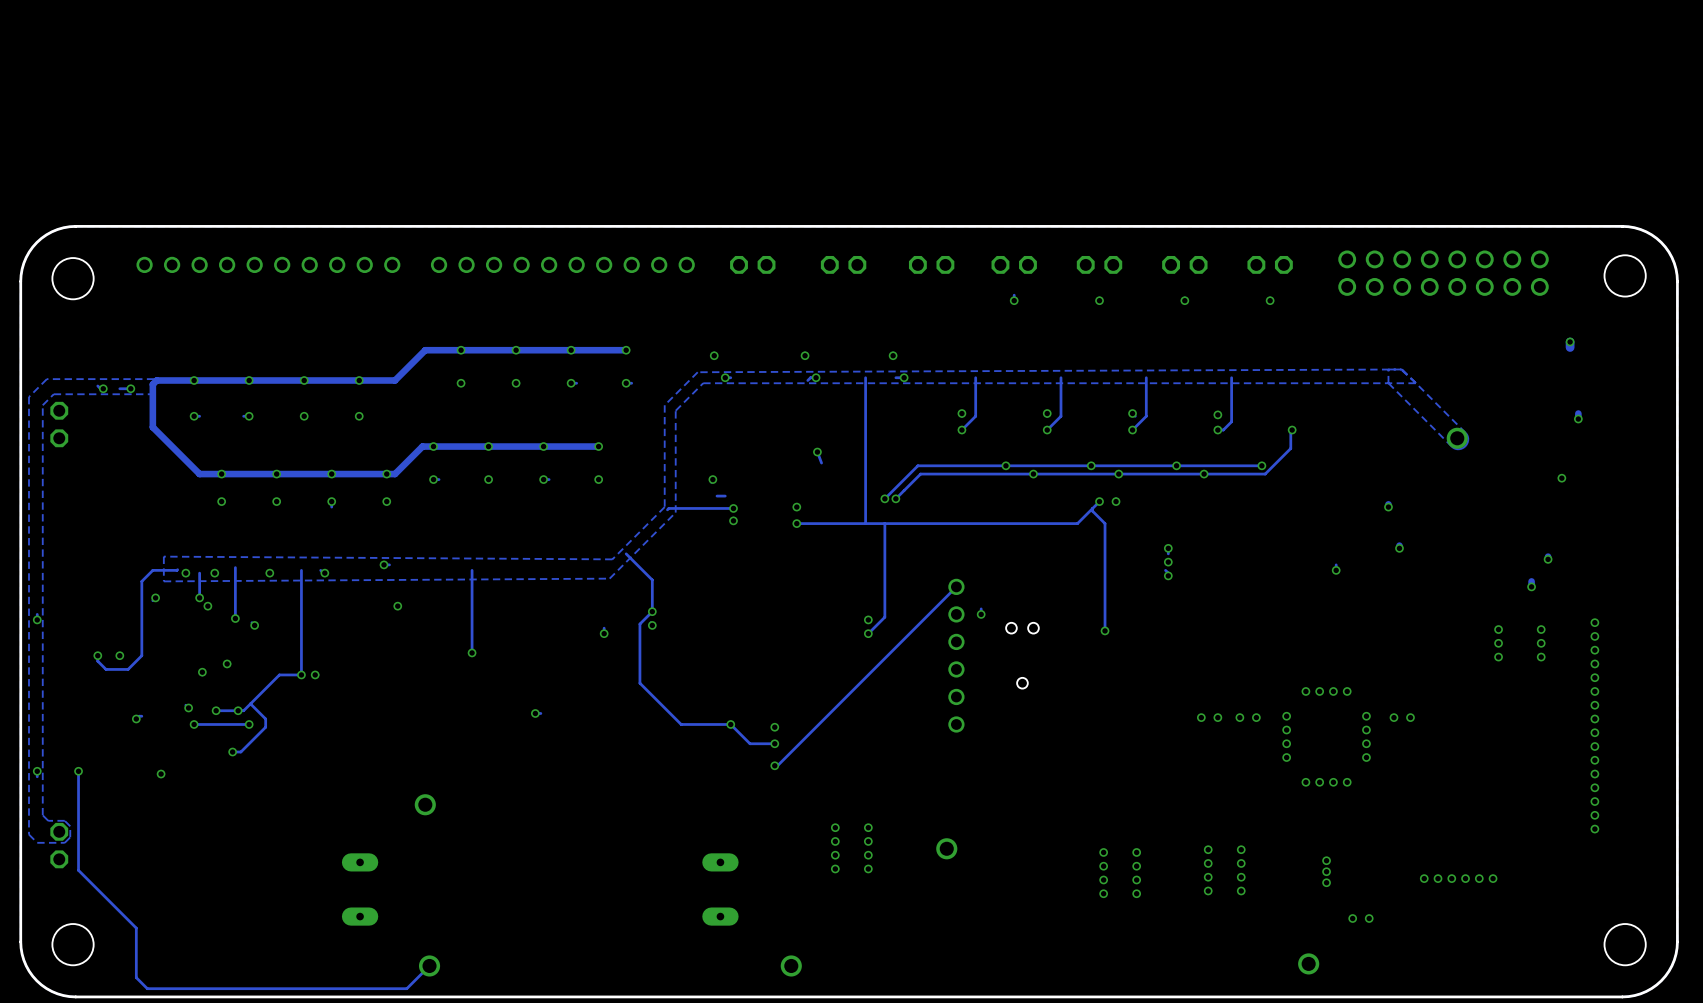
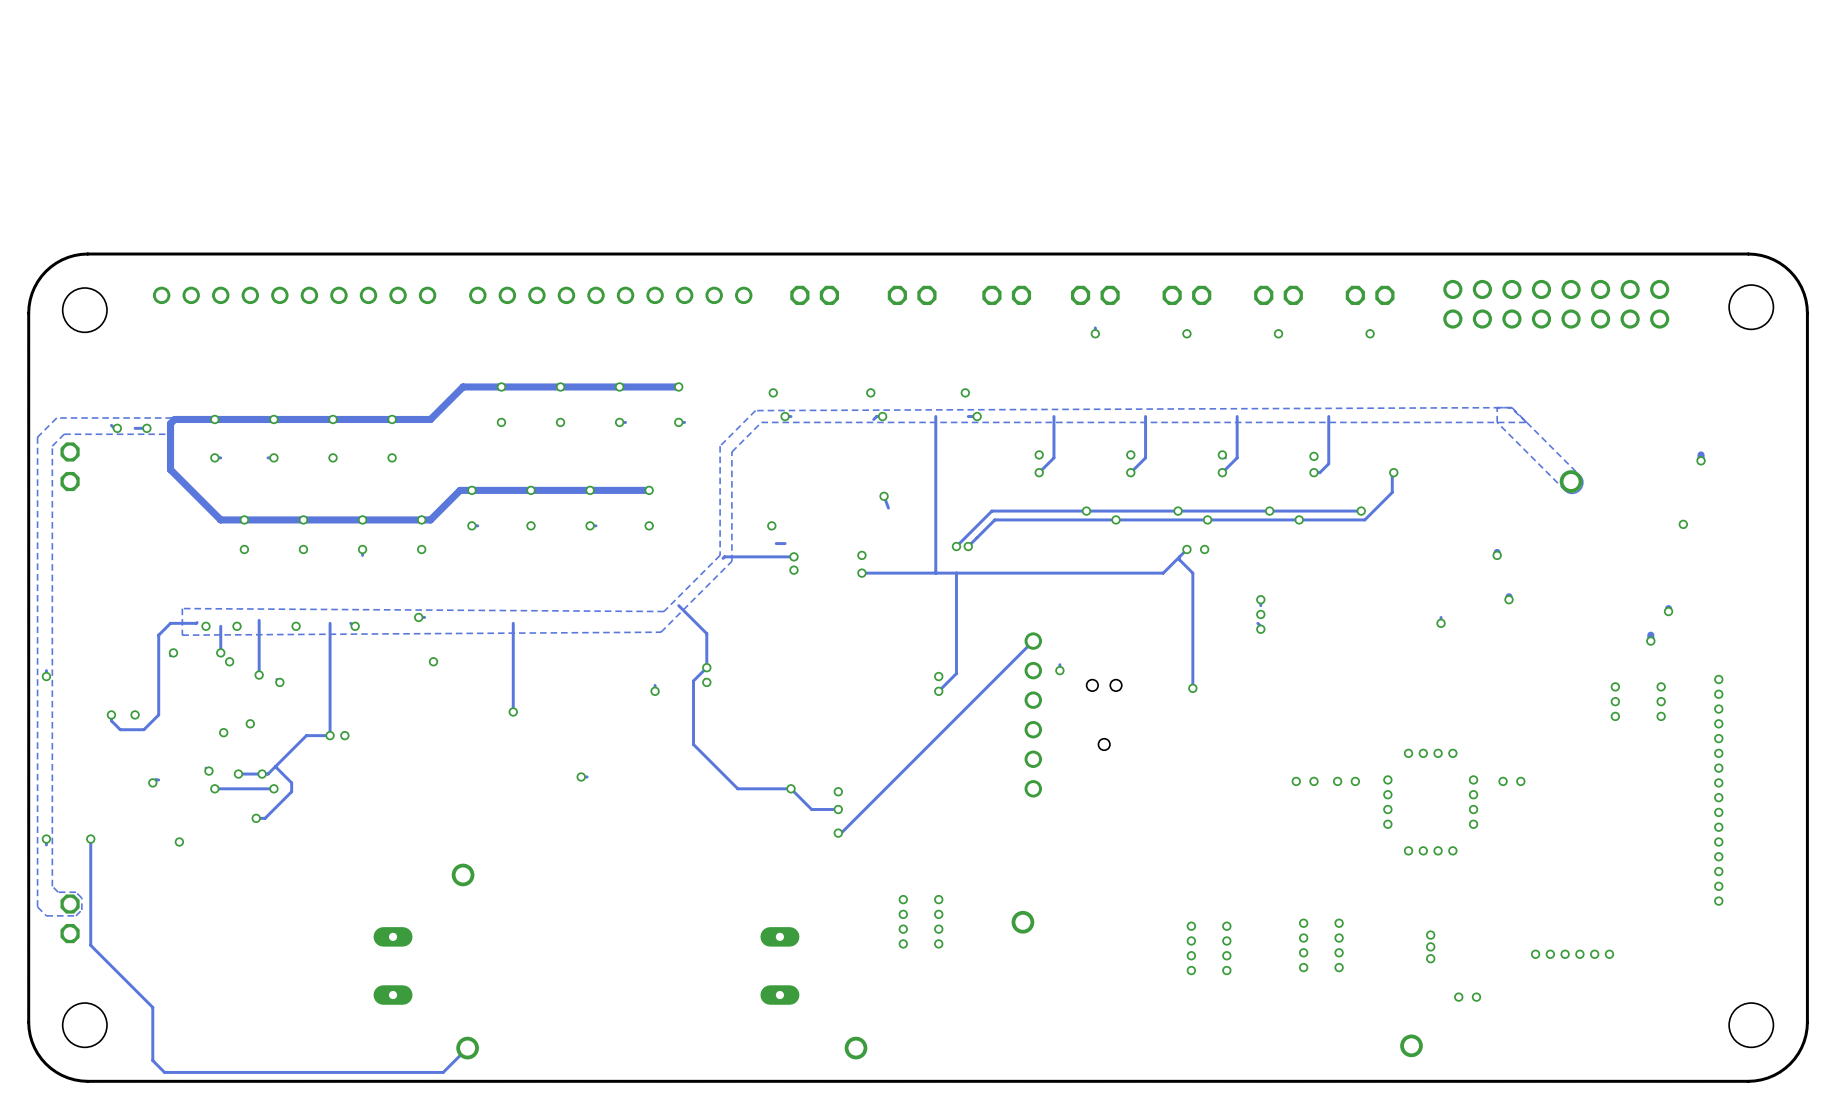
track: (1570, 341) (1570, 347) -> none
via: (1570, 341) -> none

